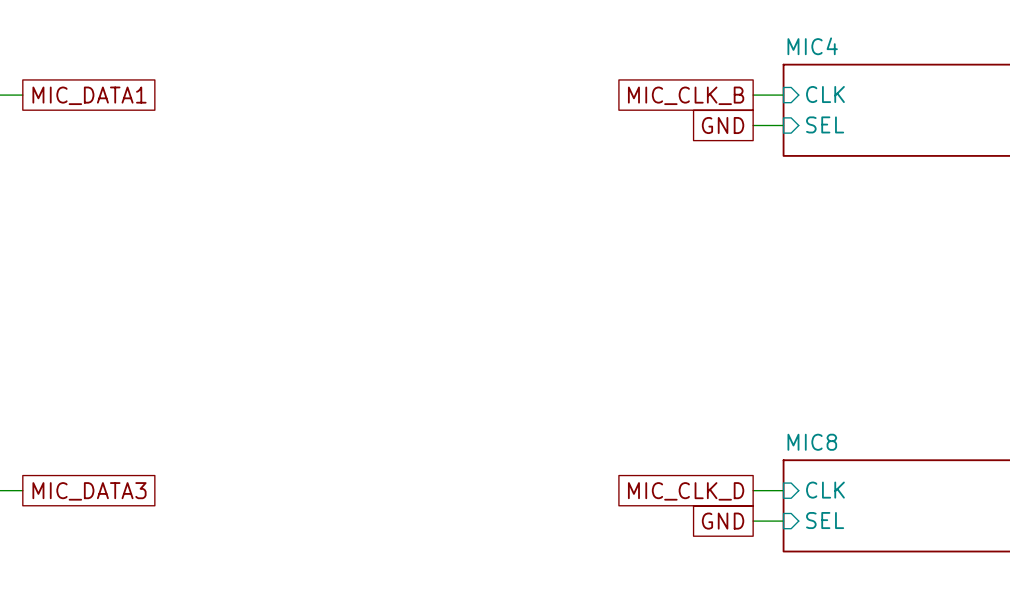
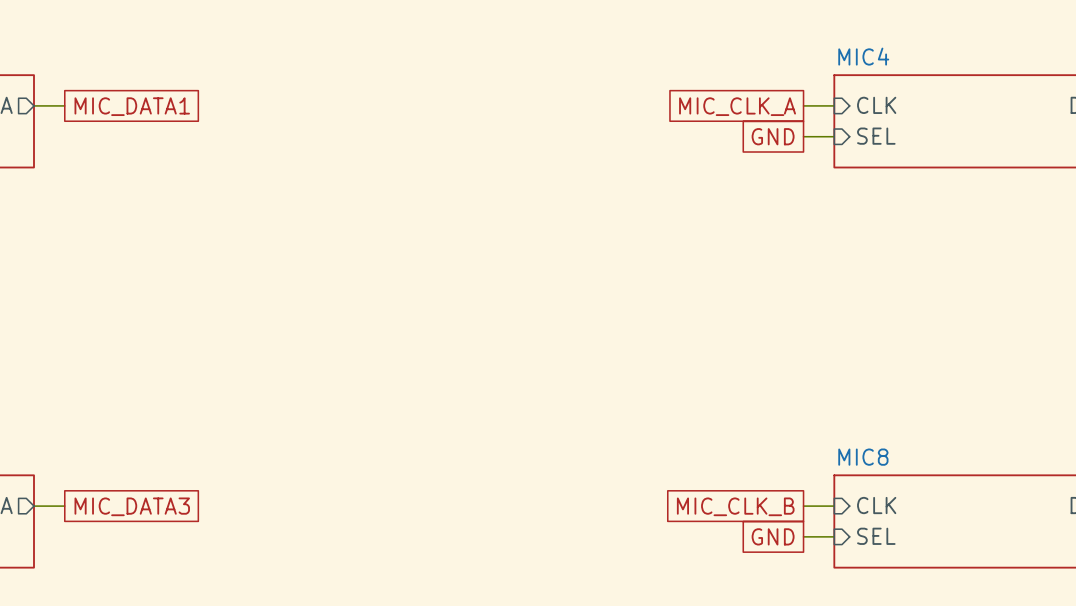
global label: MIC_CLK_B (686, 95) -> MIC_CLK_A (737, 106)
global label: MIC_CLK_D (686, 491) -> MIC_CLK_B (735, 506)

